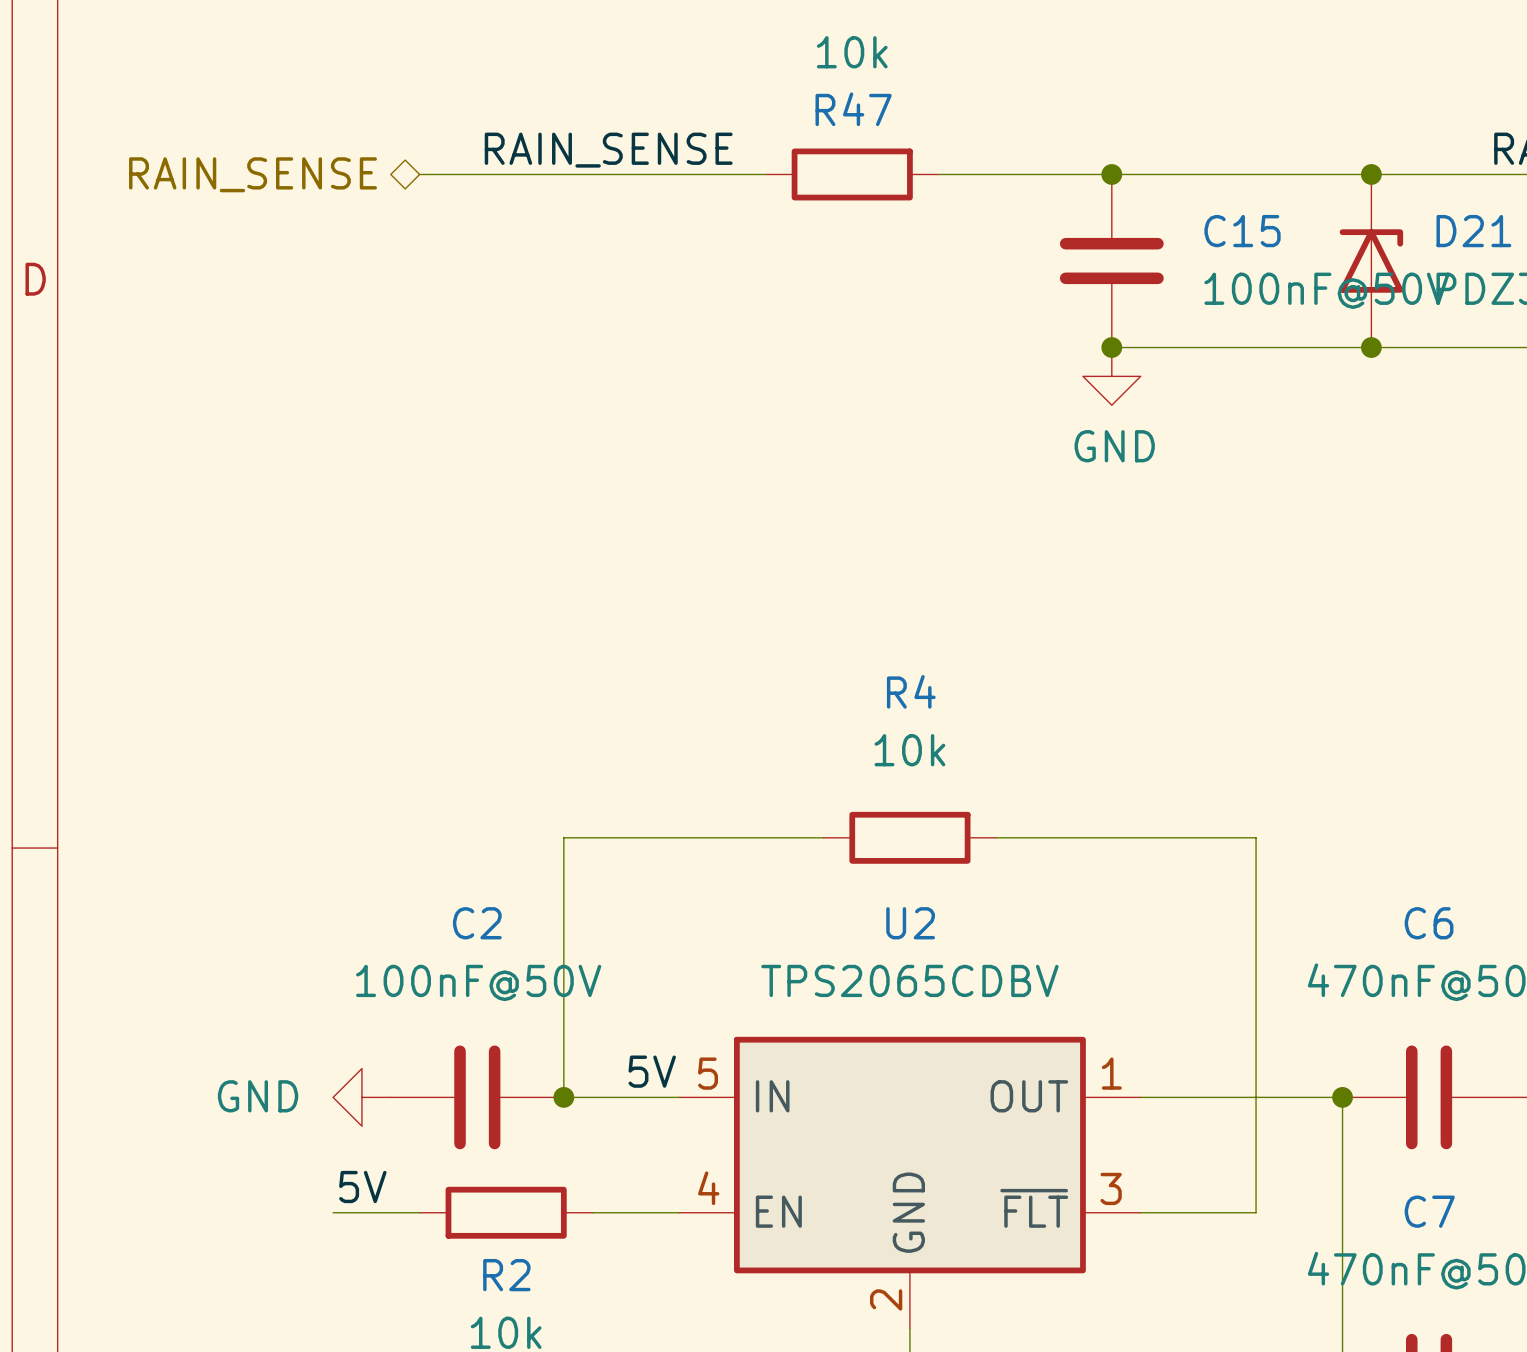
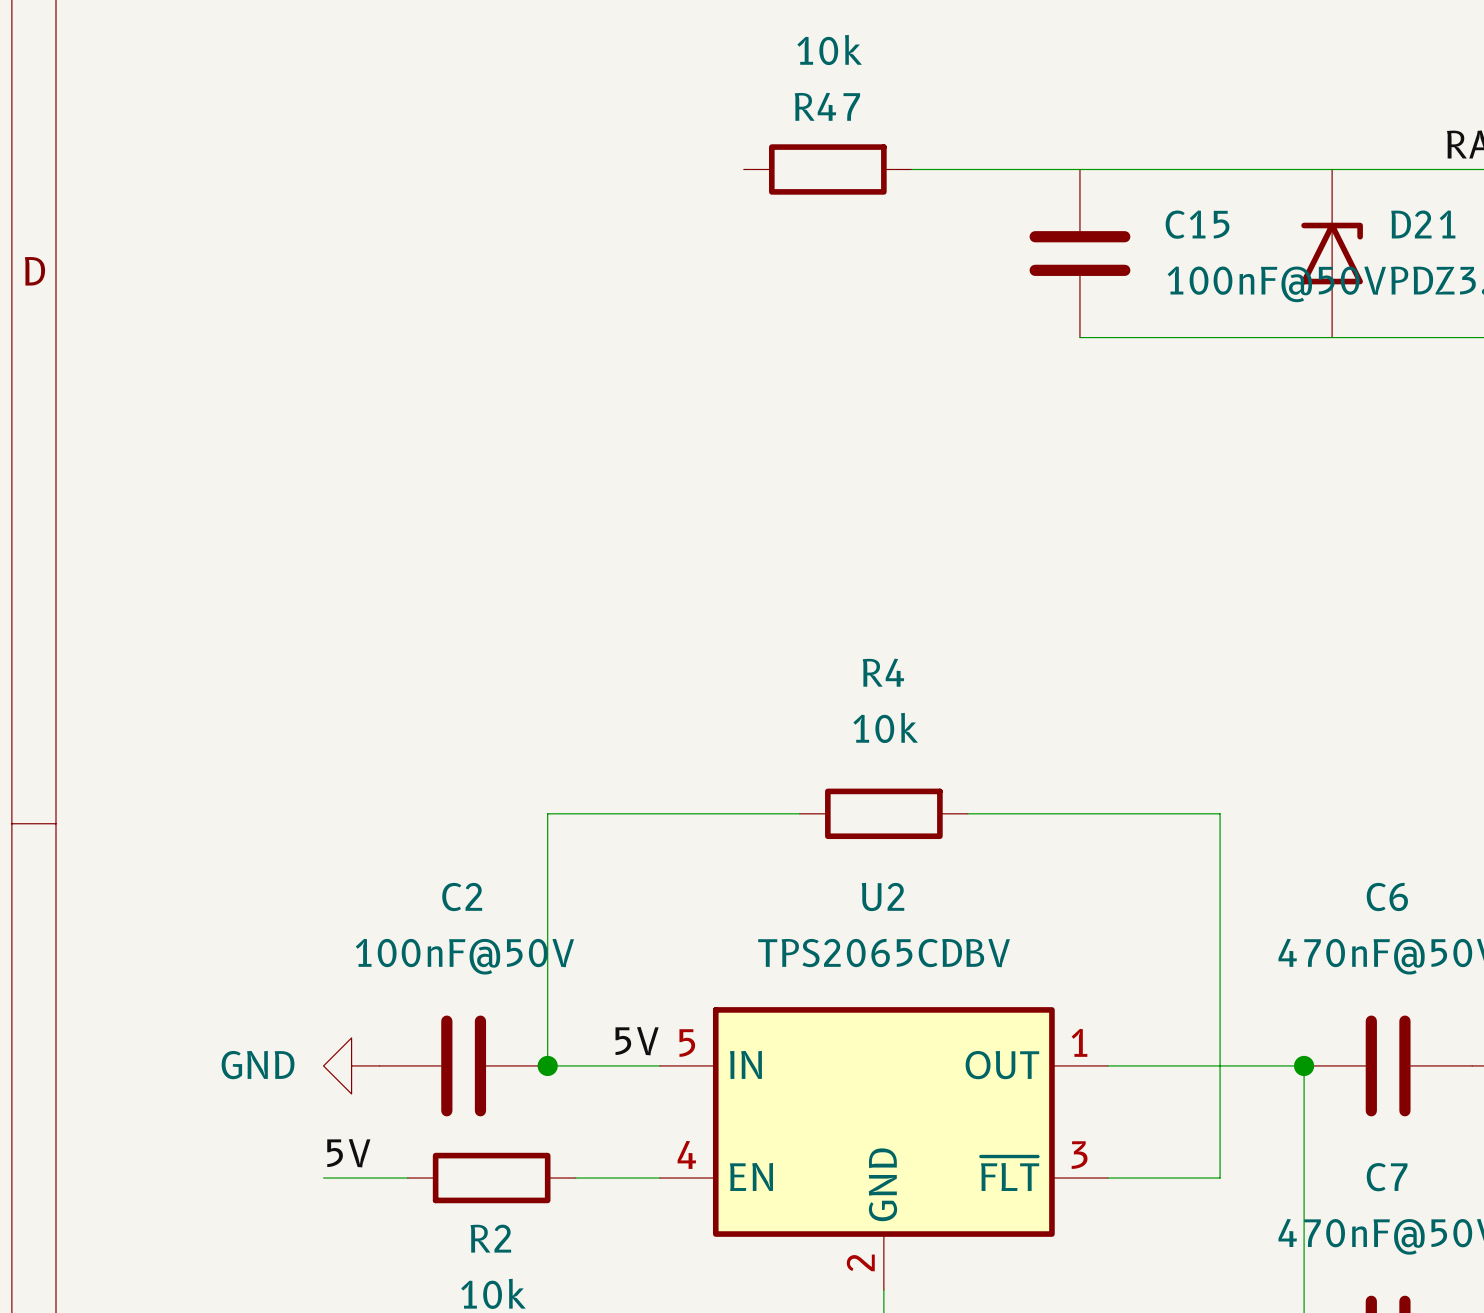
label: RAIN_SENSE (608, 150) -> none
hierarchical label: RAIN_SENSE (253, 174) -> none
wire: (419, 174) (765, 174) -> none
junction: (1111, 174) -> none
junction: (1371, 174) -> none
junction: (1111, 347) -> none
junction: (1371, 347) -> none
power symbol: GND (1111, 376) -> none

